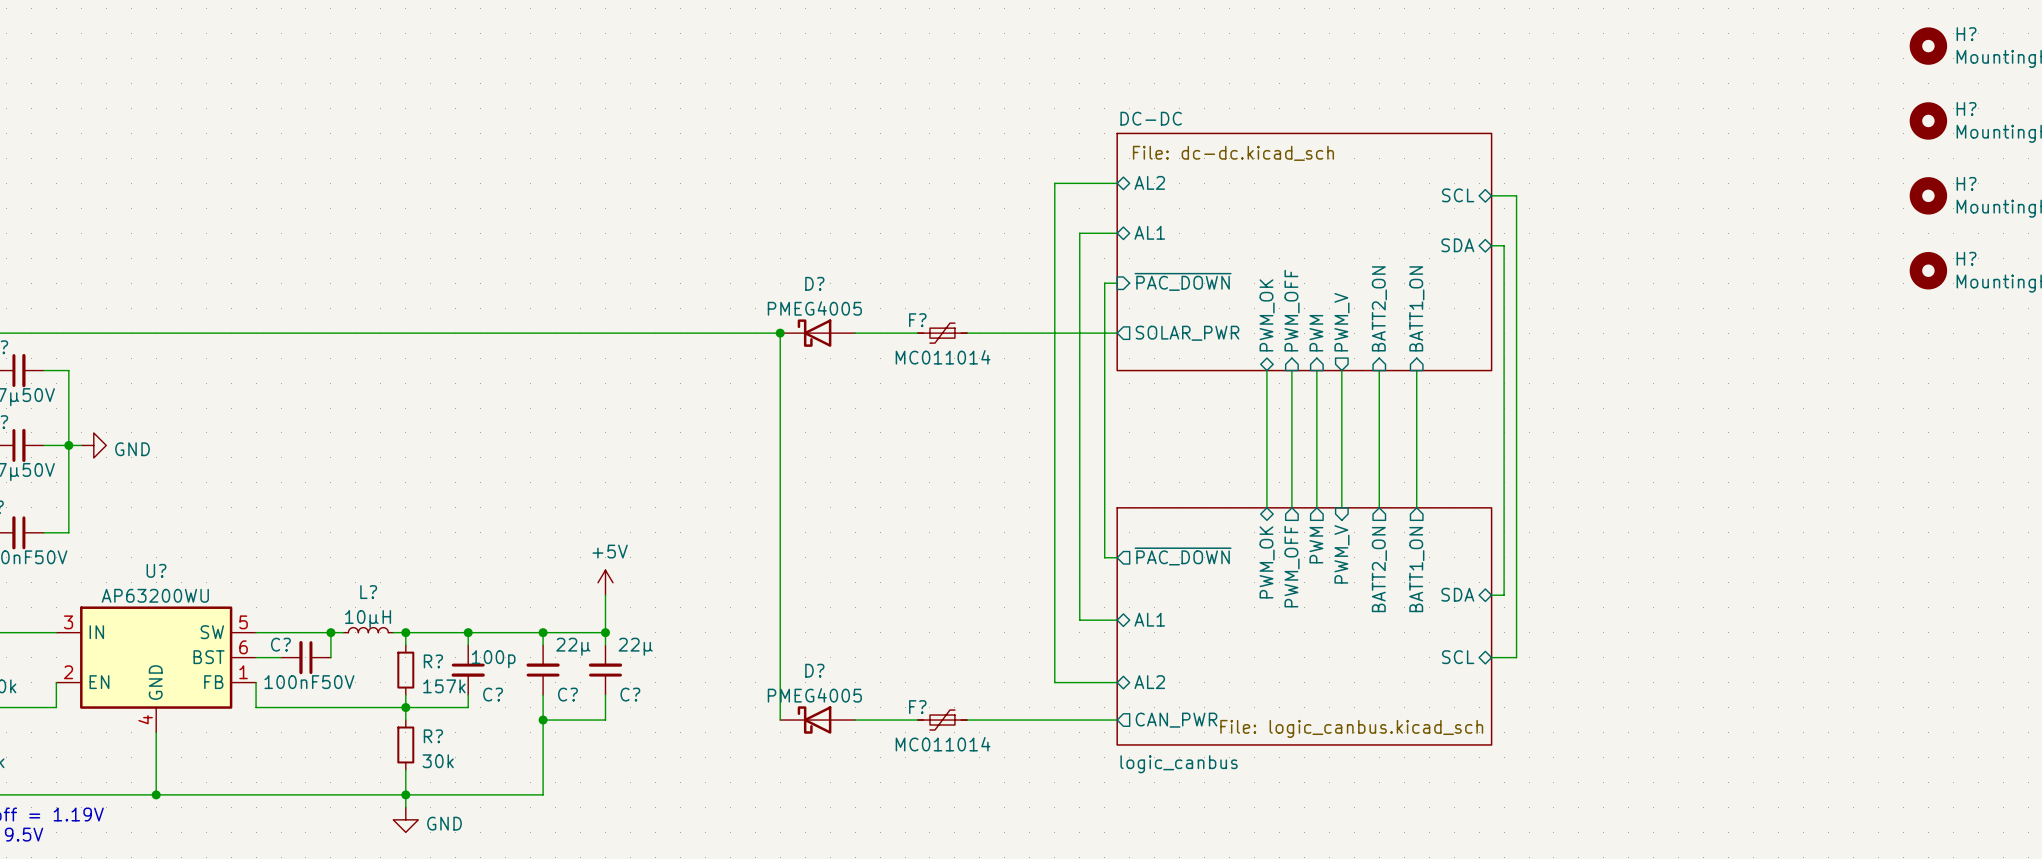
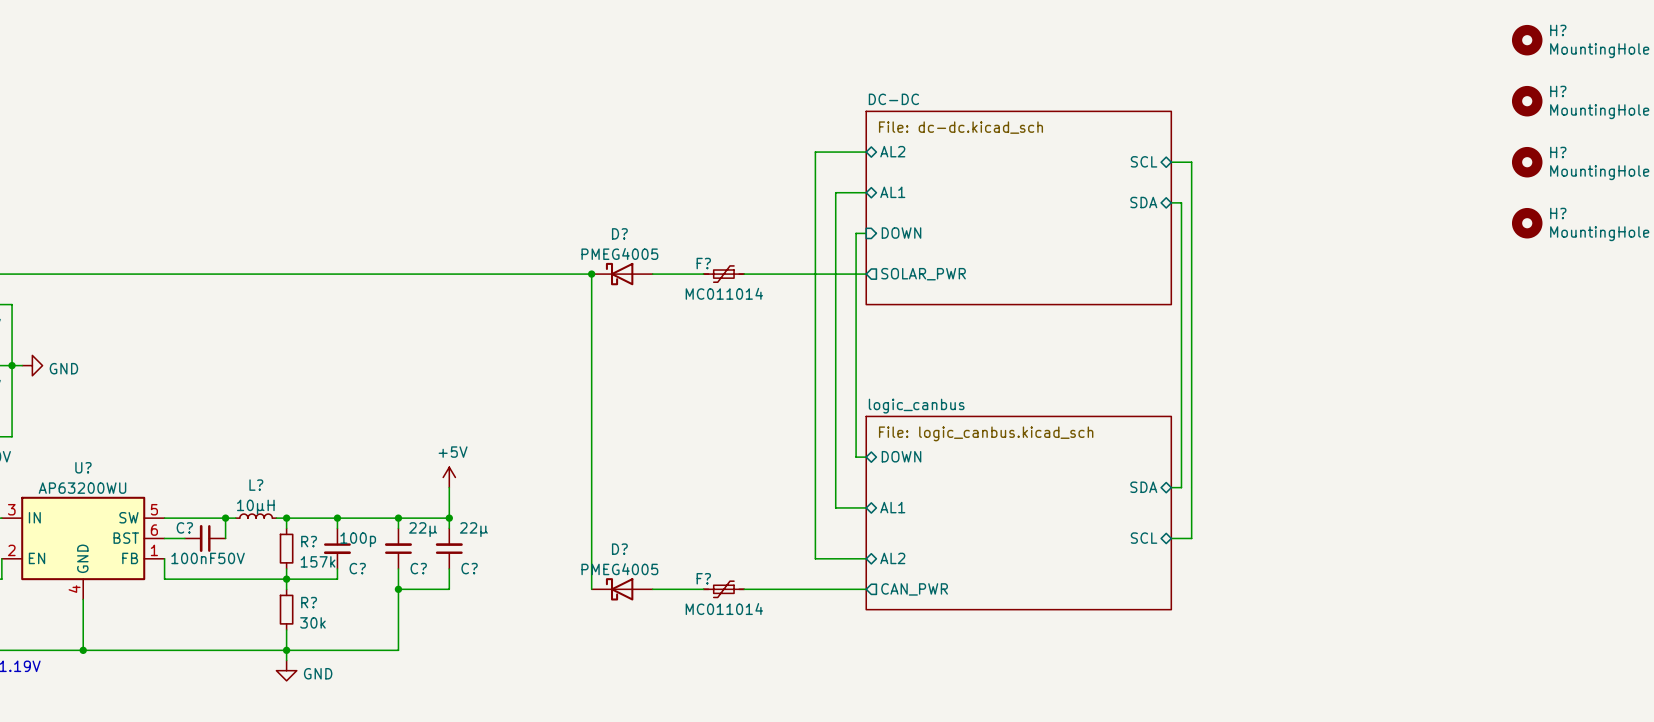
sheet pin: ~{PAC_DOWN} (1183, 281) -> DOWN (901, 233)
sheet pin: BATT2_ON (1379, 308) -> none
sheet pin: BATT1_ON (1416, 308) -> none
sheet pin: PWM_OFF (1292, 310) -> none
sheet pin: PWM_OK (1267, 315) -> none
sheet pin: PWM_V (1341, 322) -> none
sheet pin: PWM (1316, 333) -> none
wire: (1266, 370) (1266, 507) -> none
wire: (1291, 370) (1291, 507) -> none
wire: (1316, 370) (1316, 507) -> none
wire: (1341, 370) (1341, 507) -> none
wire: (1379, 370) (1379, 507) -> none
wire: (1416, 370) (1416, 507) -> none
sheet pin: PWM (1316, 545) -> none
sheet pin: PWM_V (1341, 554) -> none
sheet pin shape: output (1183, 556) -> bidirectional (901, 456)
sheet pin: ~{PAC_DOWN} (1183, 556) -> DOWN (901, 456)
sheet pin: PWM_OK (1267, 562) -> none
sheet pin: PWM_OFF (1292, 566) -> none
sheet pin: BATT2_ON (1379, 569) -> none
sheet pin: BATT1_ON (1416, 569) -> none
sheet logic_canbus value position: File: logic_canbus.kicad_sch (1351, 728) -> File: logic_canbus.kicad_sch (986, 433)
sheet logic_canbus name position: logic_canbus (1179, 764) -> logic_canbus (916, 406)

